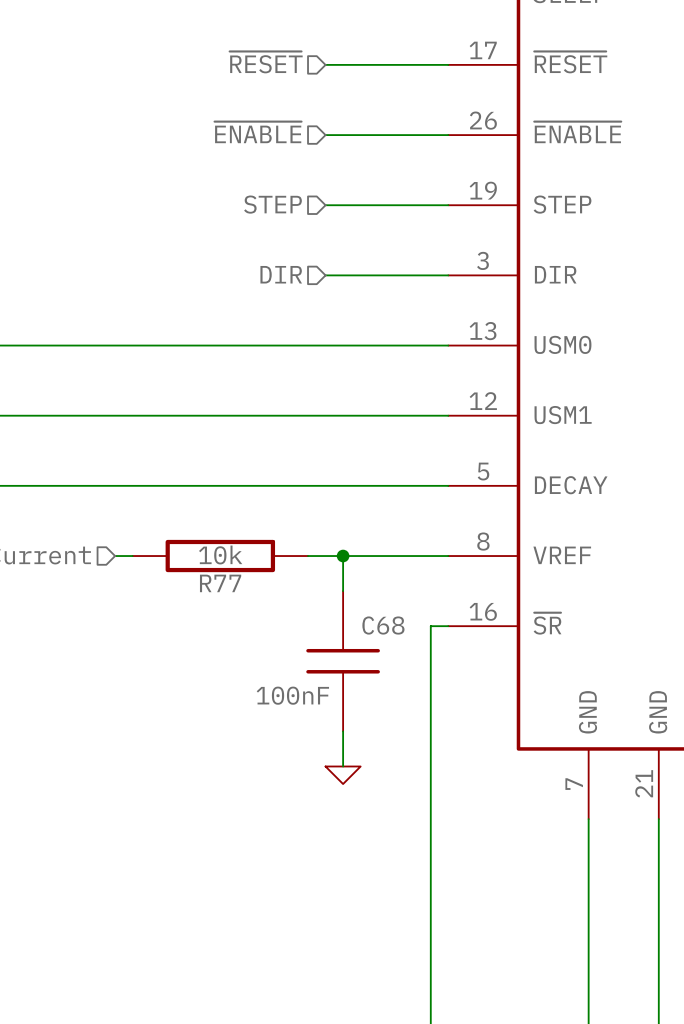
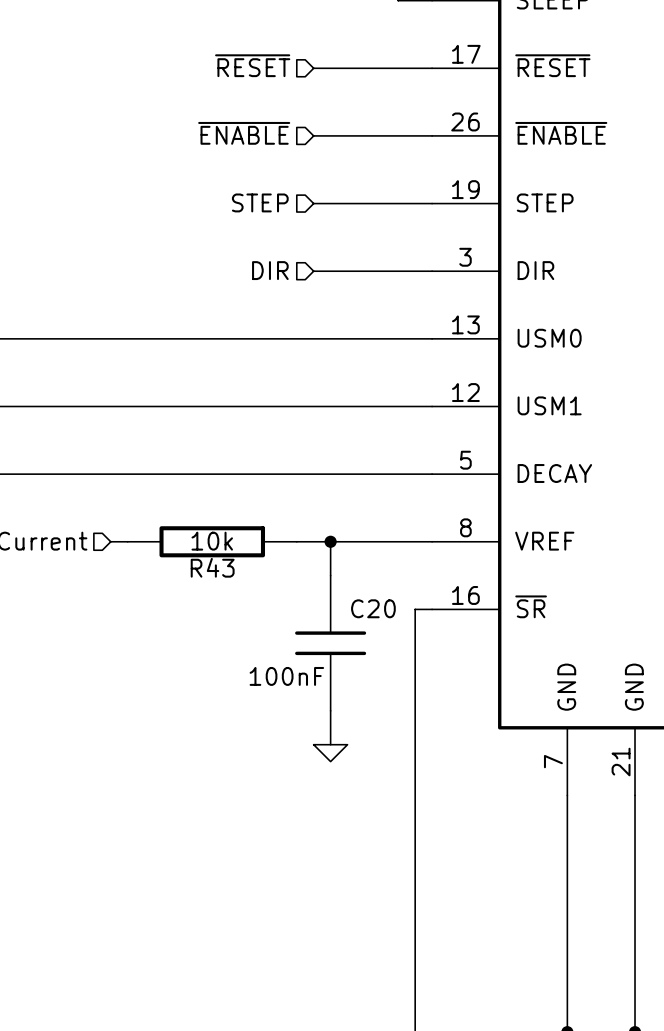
R77 name: R77 (220, 583) -> R43 (212, 567)
C68 name: C68 (383, 625) -> C20 (373, 608)

